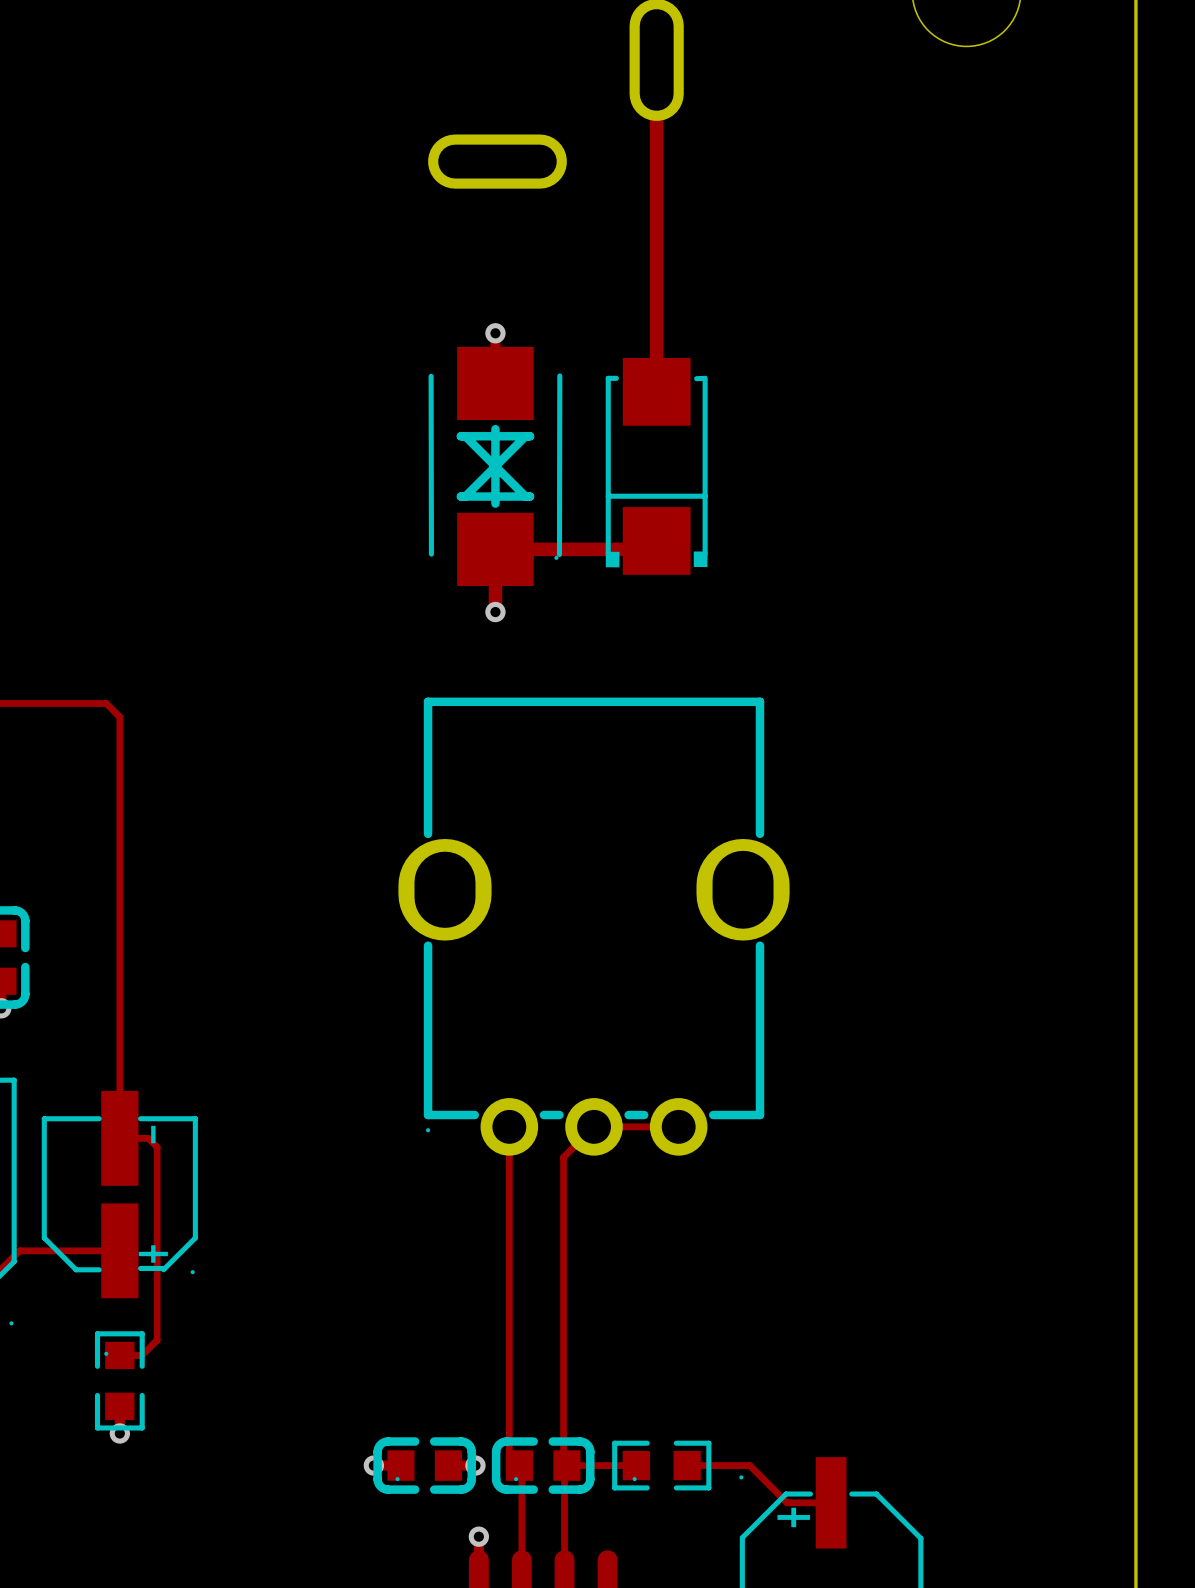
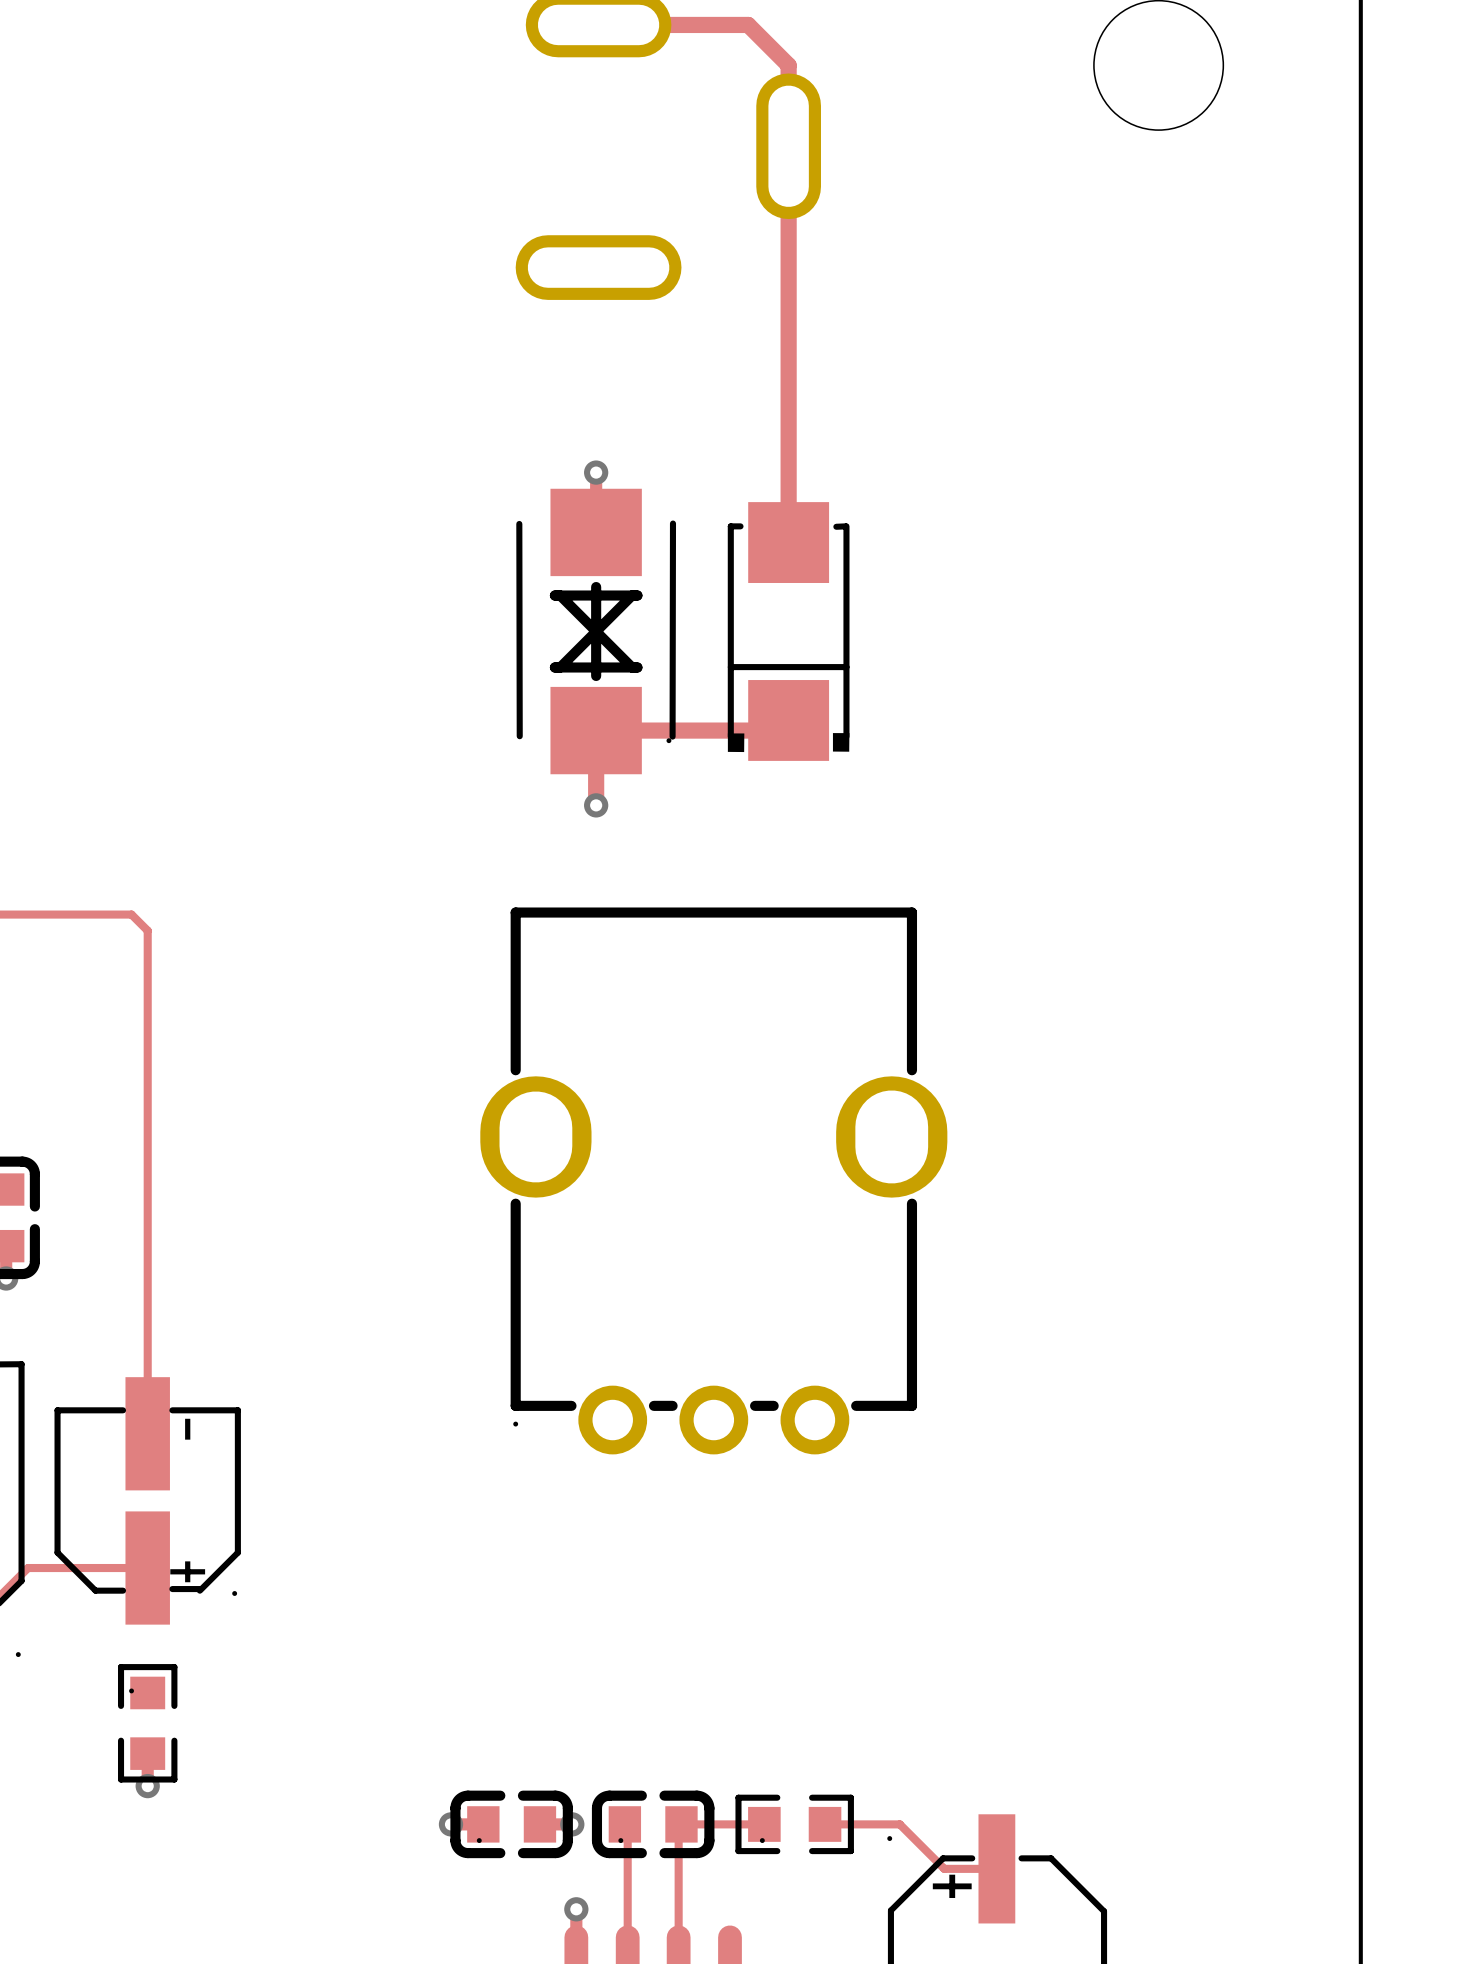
track: (509, 1126) (509, 1455) (519, 1465) -> none
track: (678, 1126) (594, 1126) (563, 1157) (563, 1462) (566, 1465) -> none
track: (119, 1138) (148, 1138) (157, 1147) (157, 1340) (141, 1355) (119, 1355) -> none

